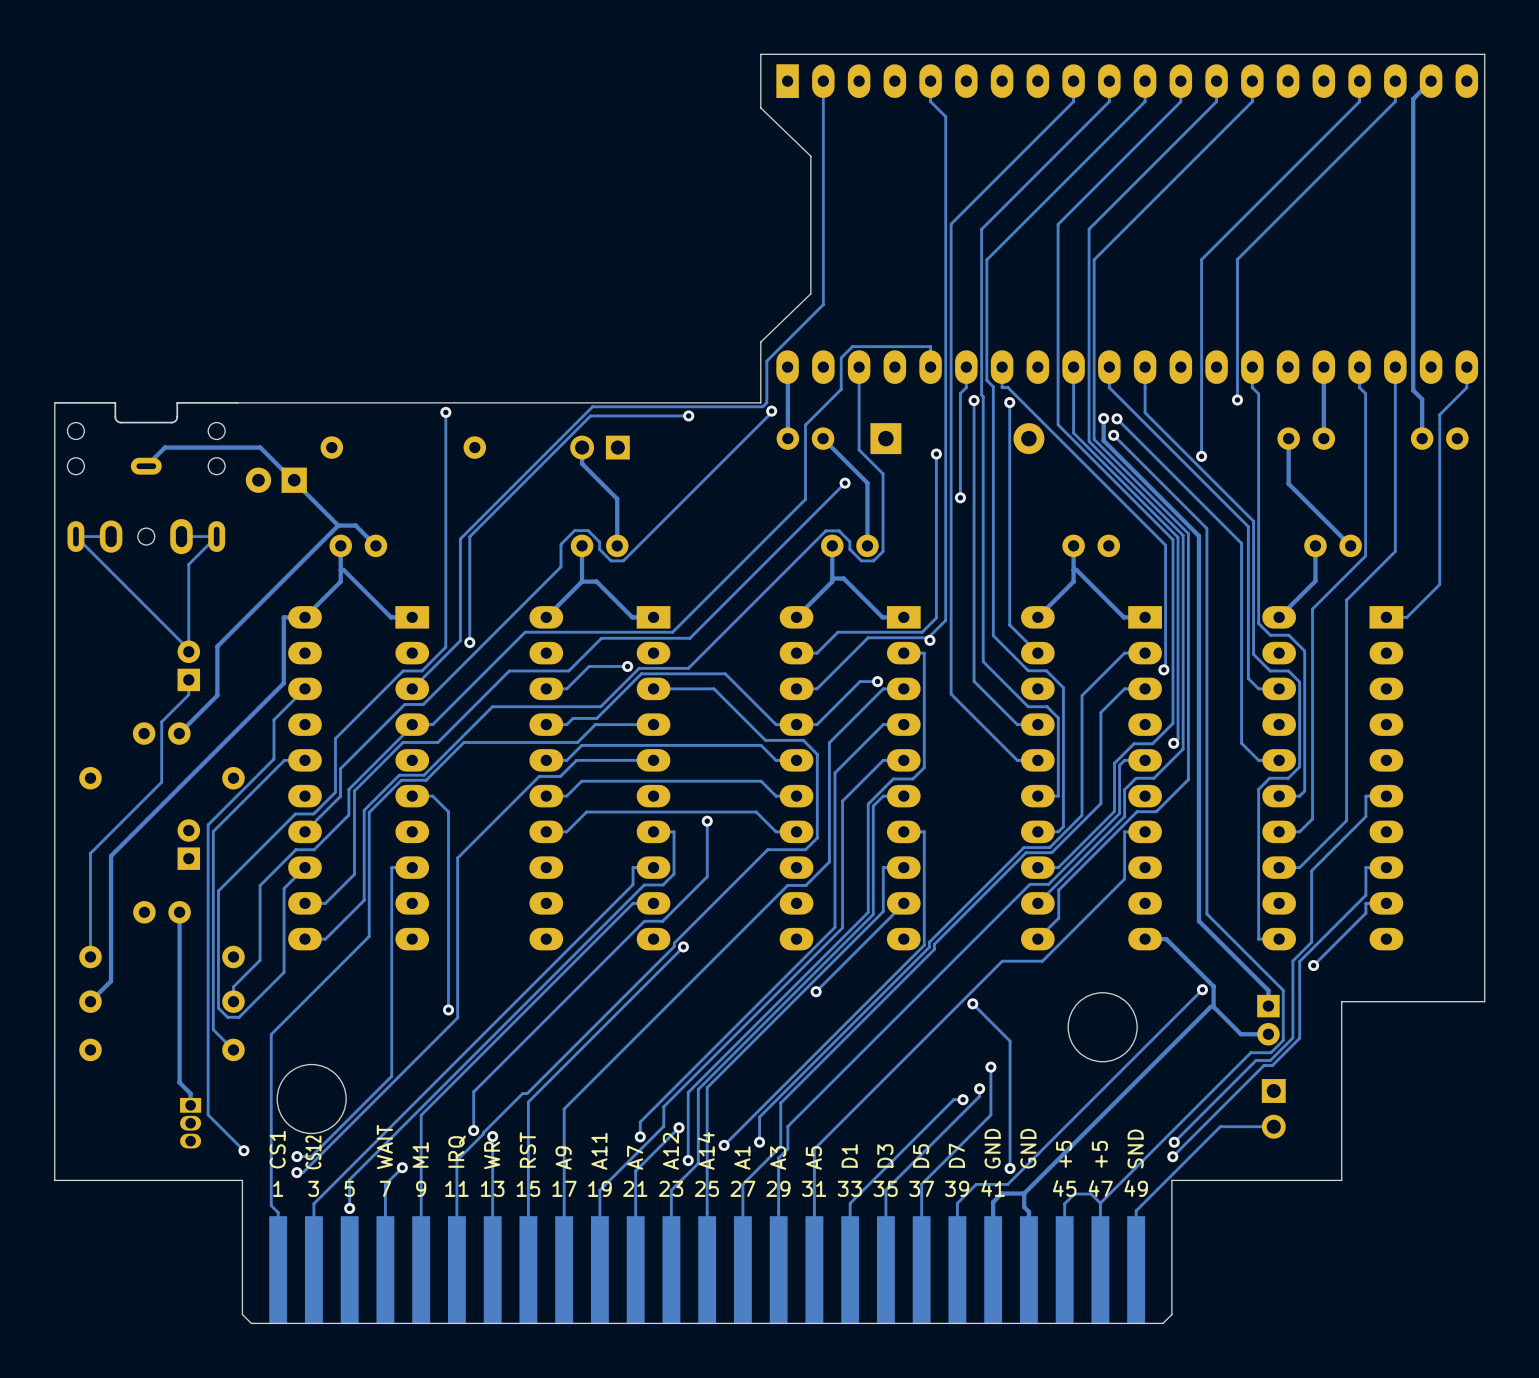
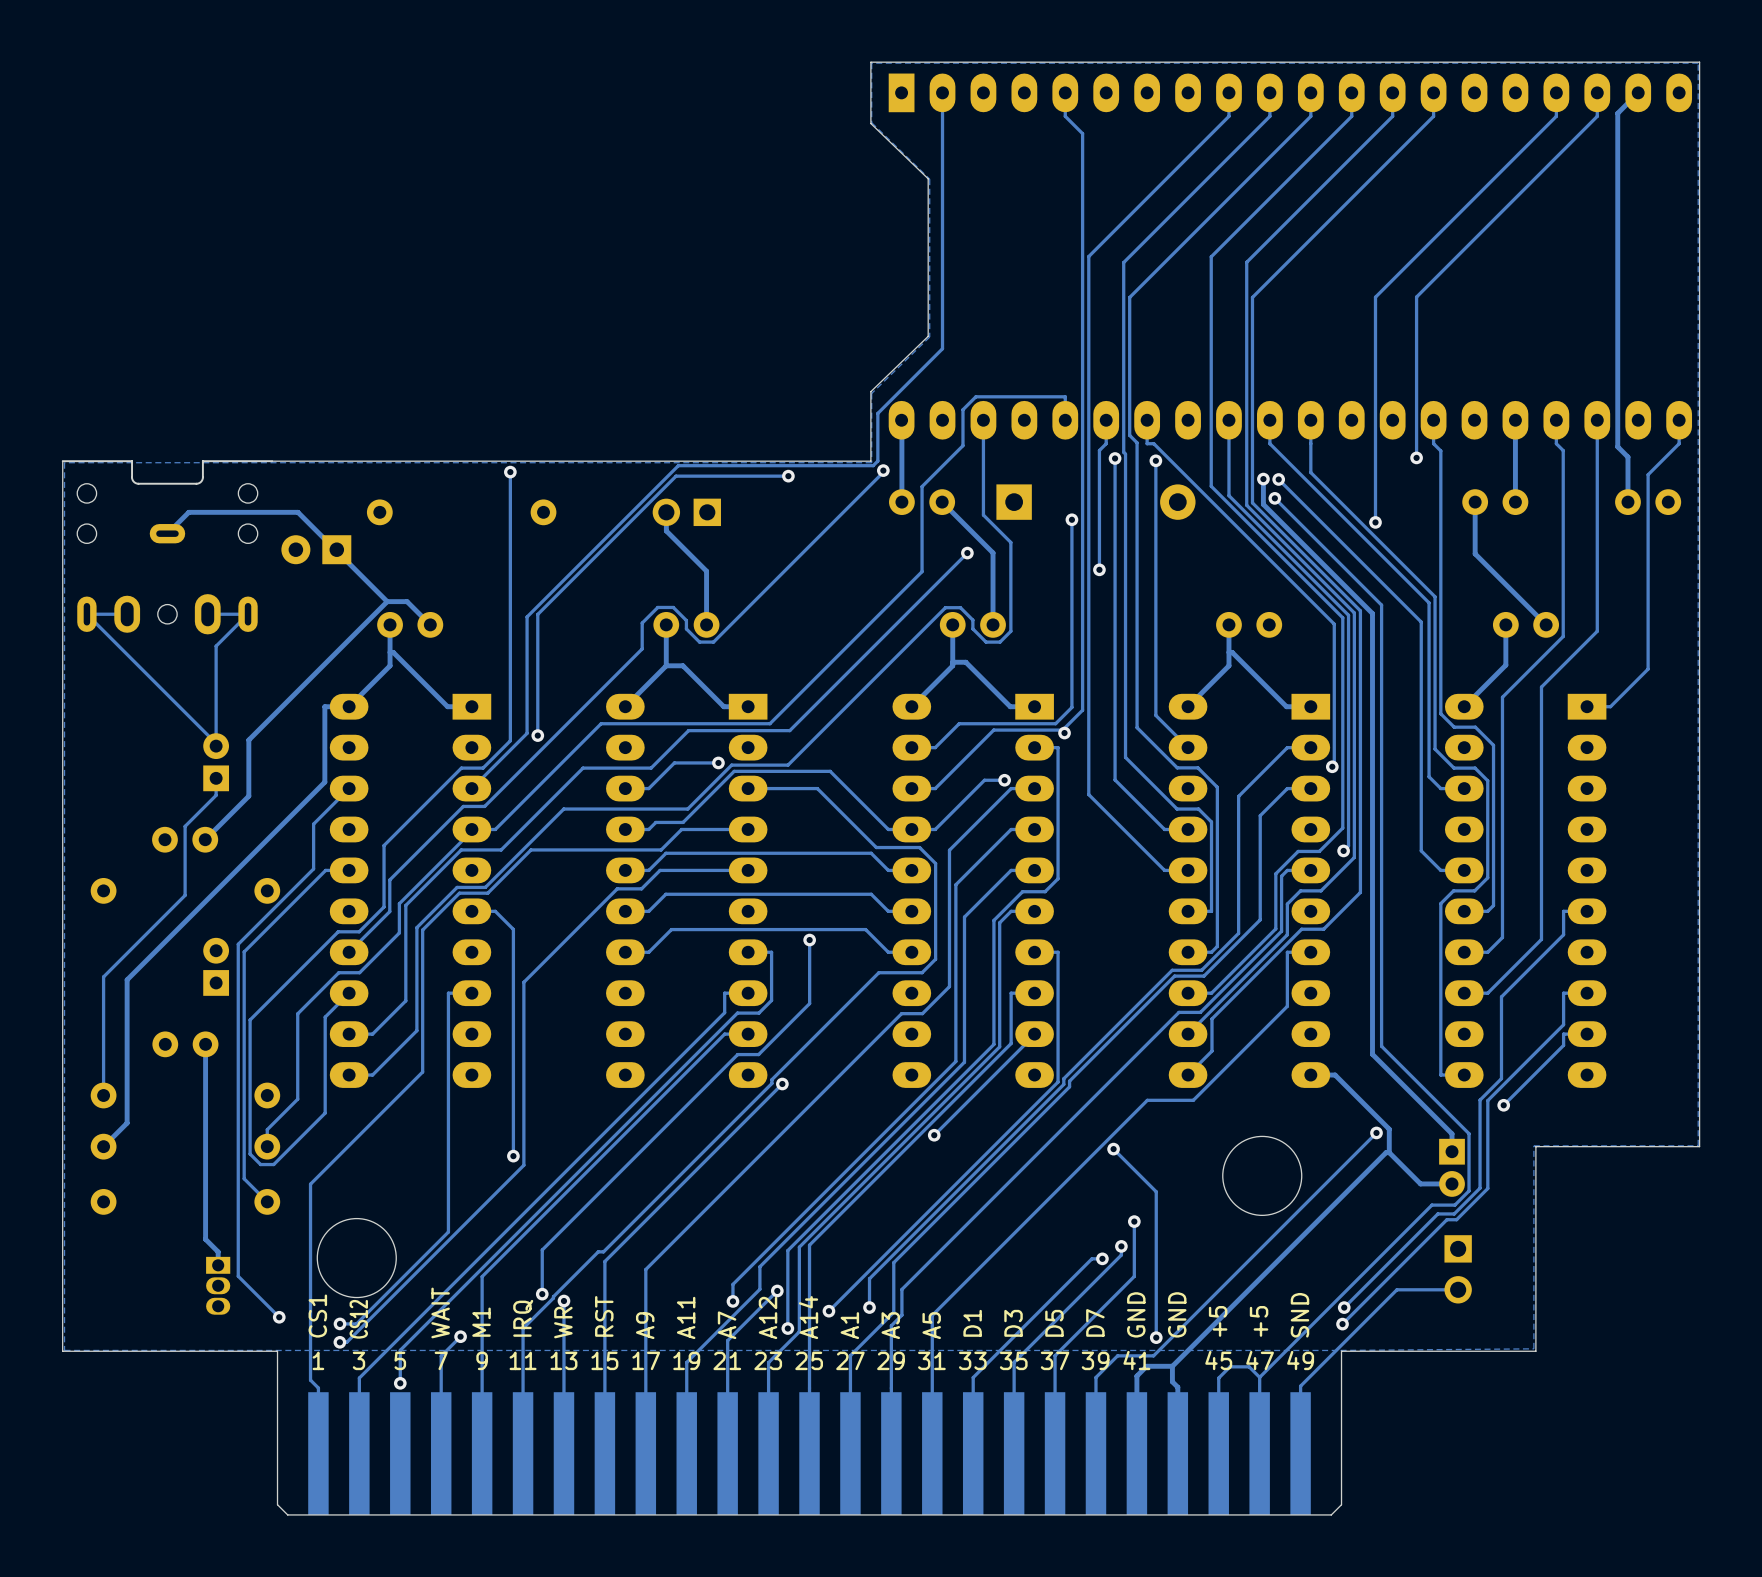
zone outline: none -> (1698, 63) (871, 63) (871, 122) (929, 179) (929, 337) (871, 393) (871, 462) (64, 462) (64, 1350) (1533, 1348) (1533, 1145) (1698, 1145) (1698, 63)

